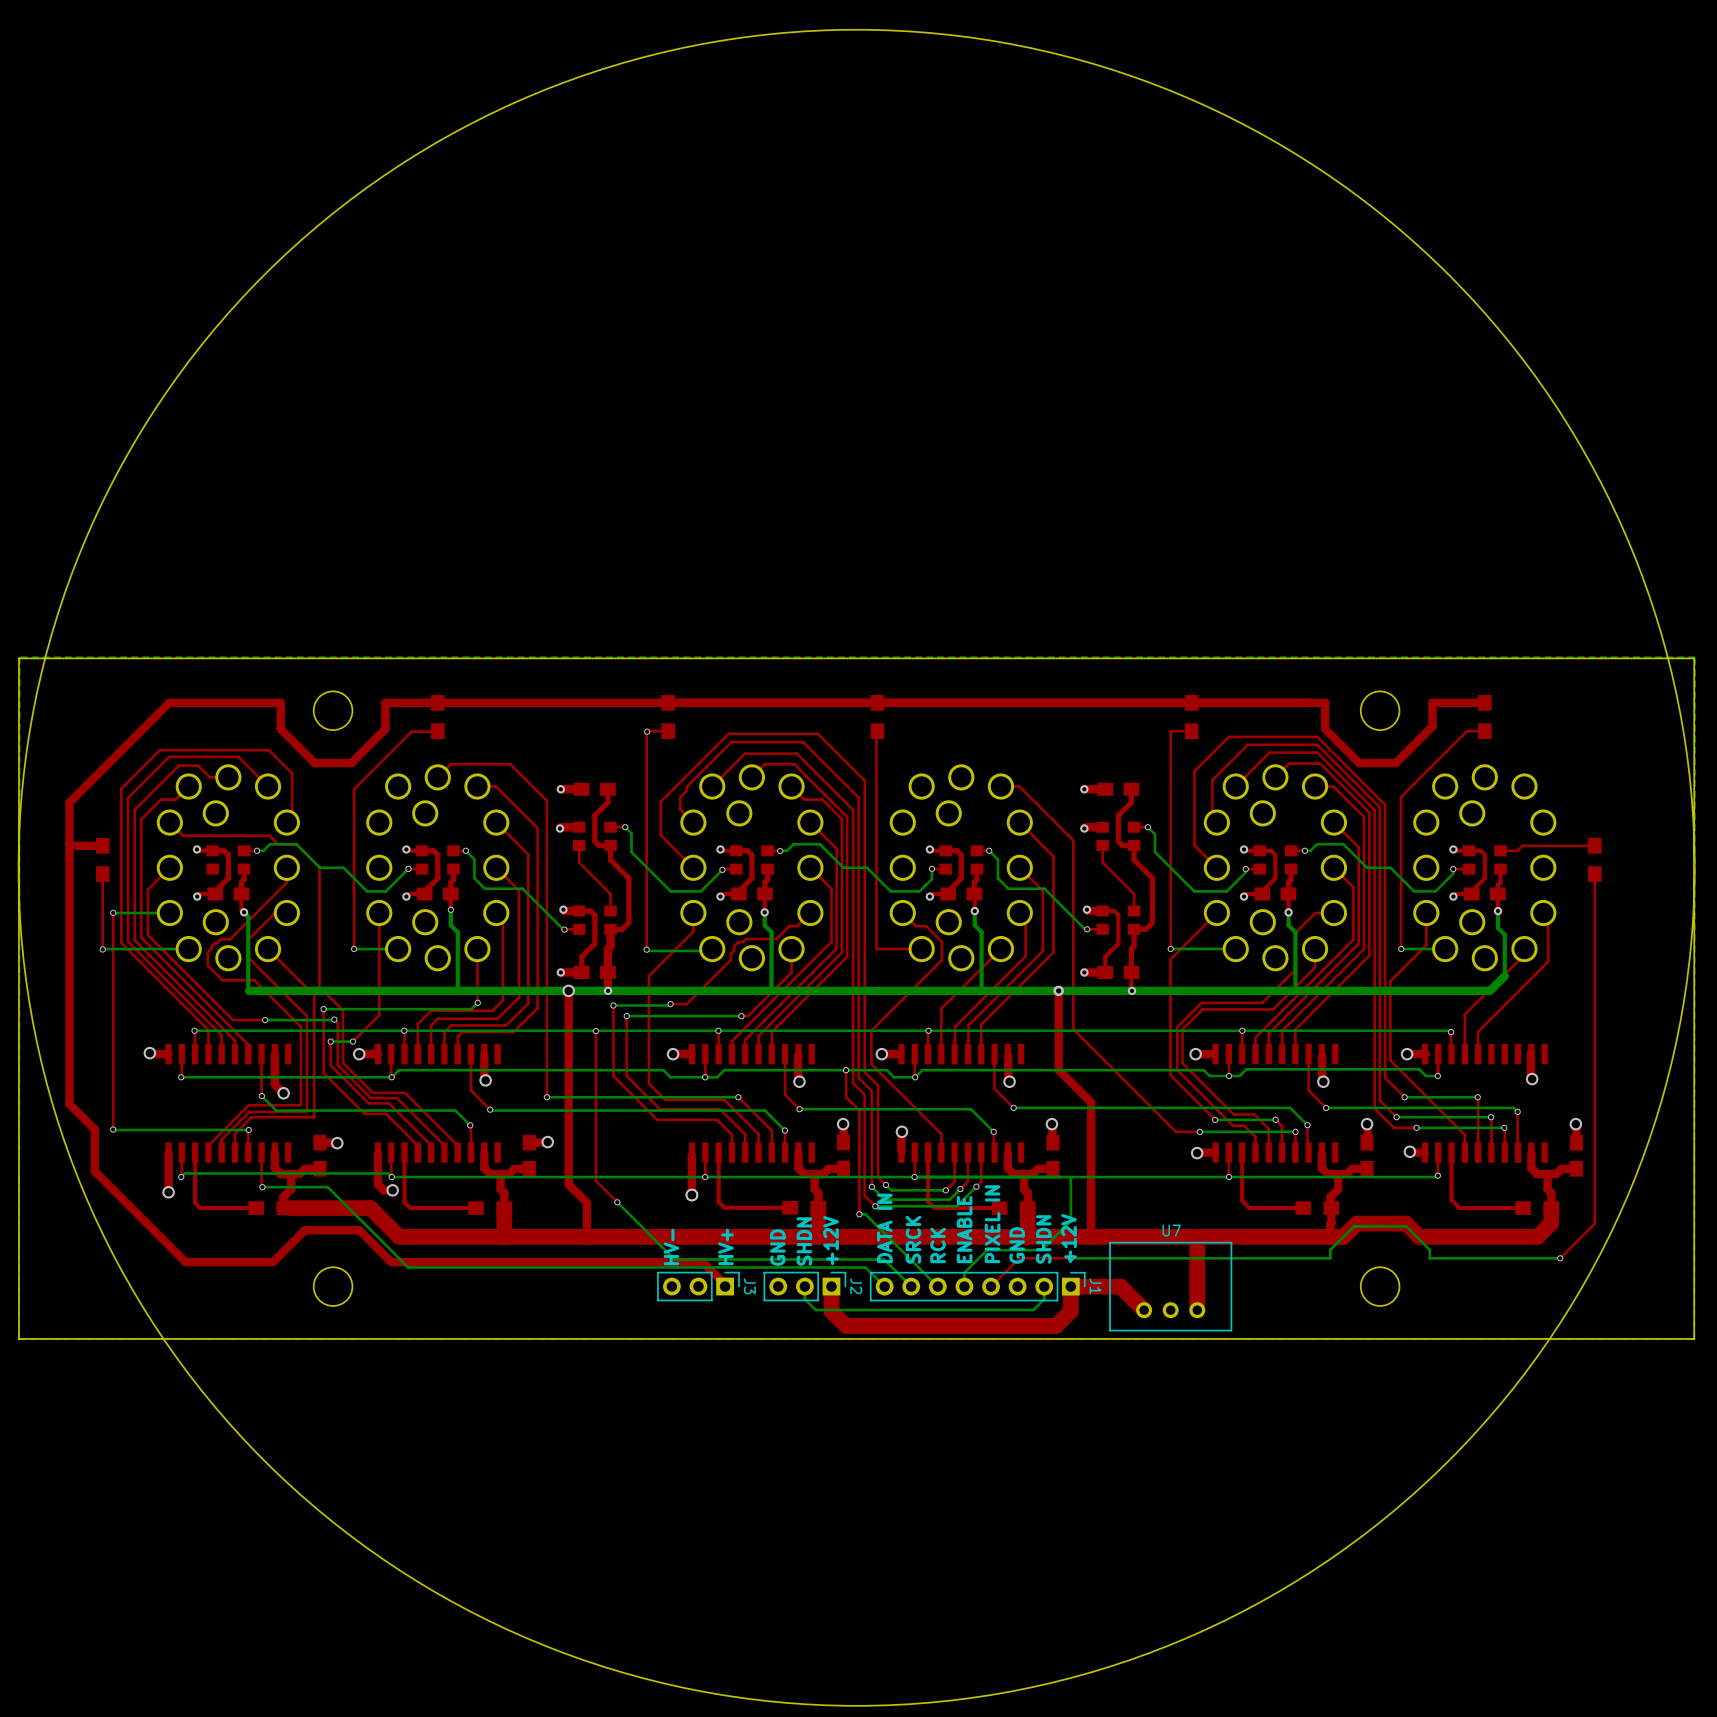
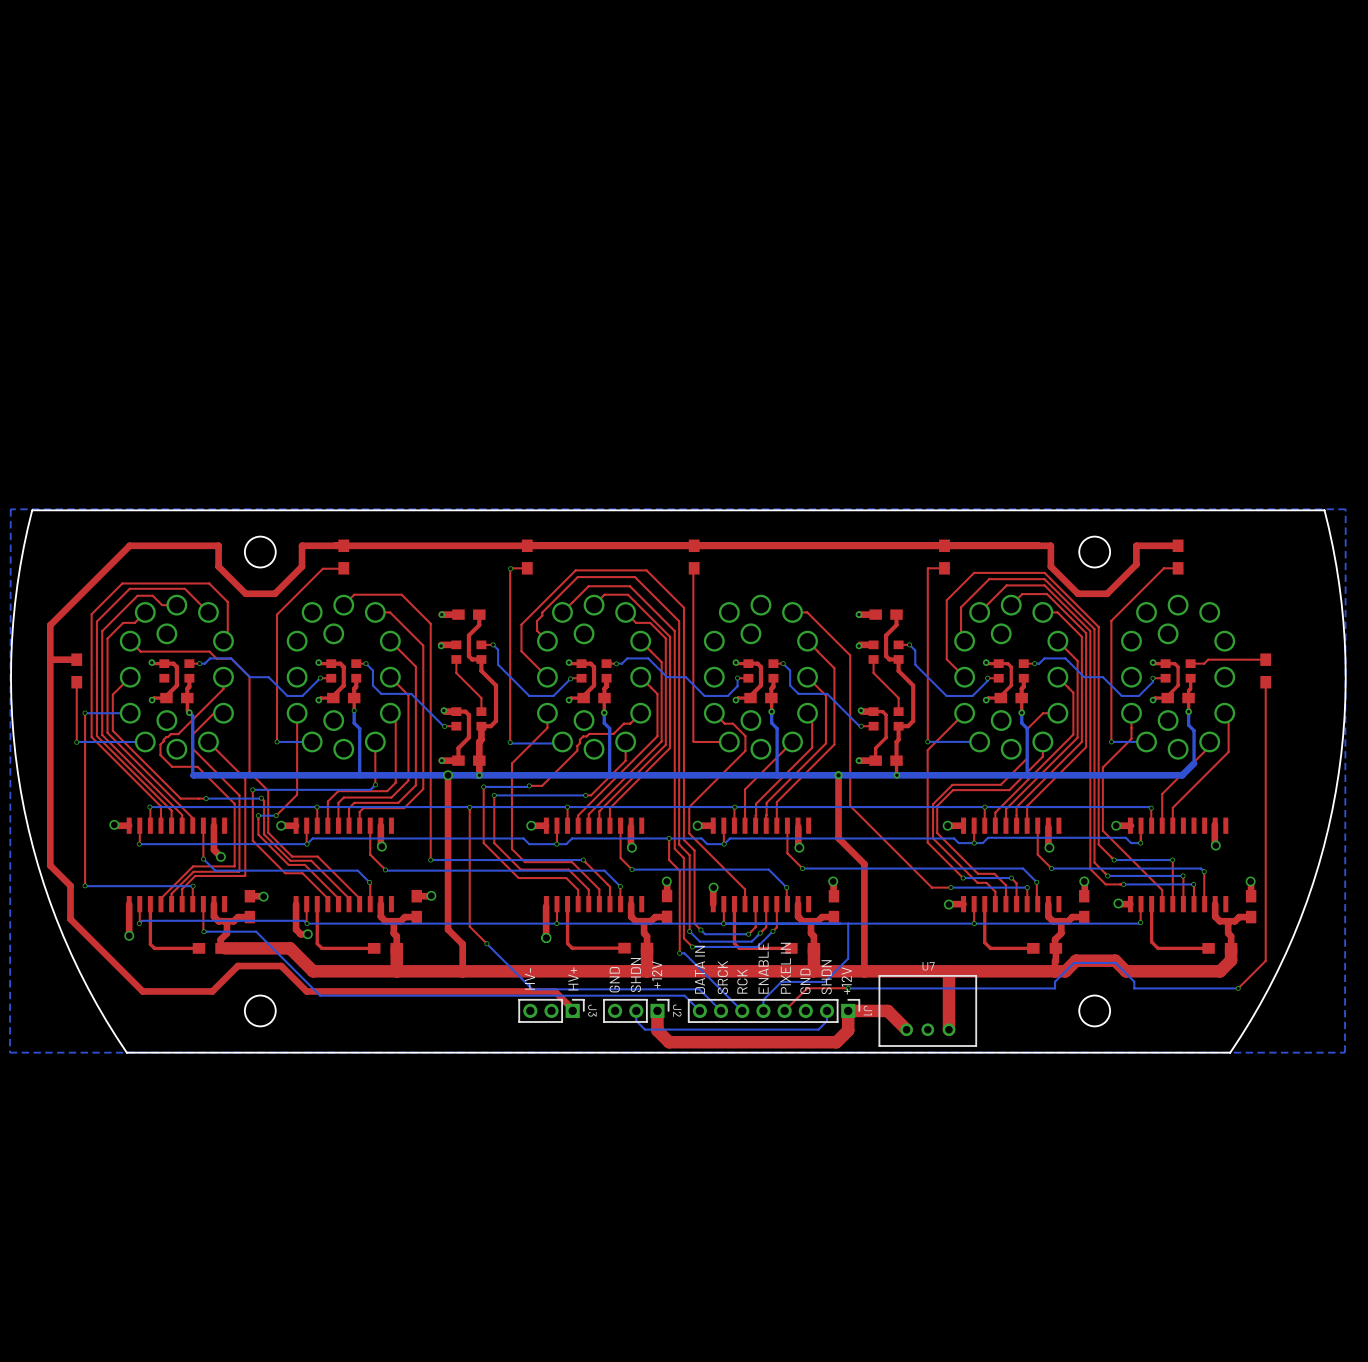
round board edge: [17, 28, 1696, 1707] -> none
board edge: (46, 658) (18, 658) (18, 1338) (165, 1338) -> (32, 510) (17, 584) (11, 640) (12, 716) (20, 791) (38, 865) (63, 936) (87, 987) (126, 1052)
board edge: (1668, 658) (1694, 658) (1694, 1338) (1550, 1338) -> (1324, 510) (1339, 584) (1345, 659) (1343, 735) (1335, 791) (1323, 847) (1300, 918) (1269, 987) (1230, 1052)

